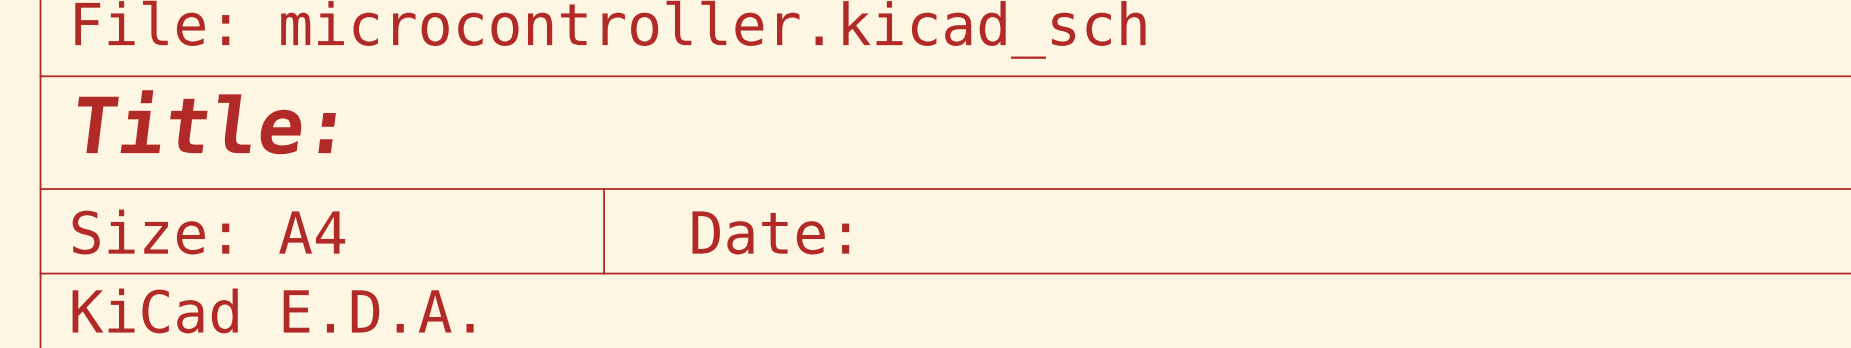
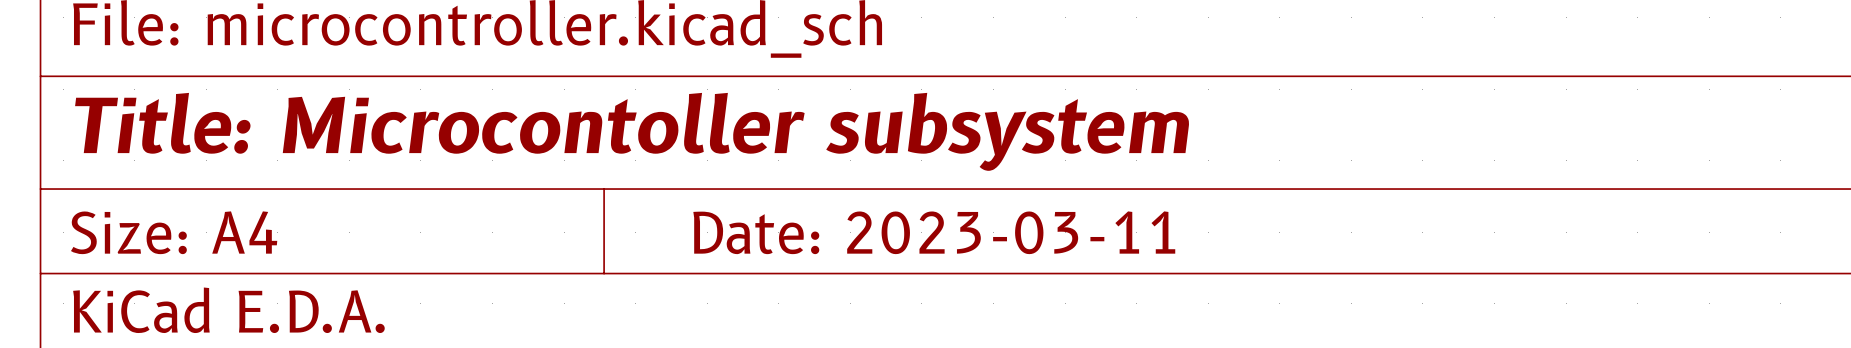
title block: Title: (206, 122) -> Title: Microcontoller subsystem (632, 131)
title block: Date: (770, 232) -> Date: 2023-03-11 (934, 232)

